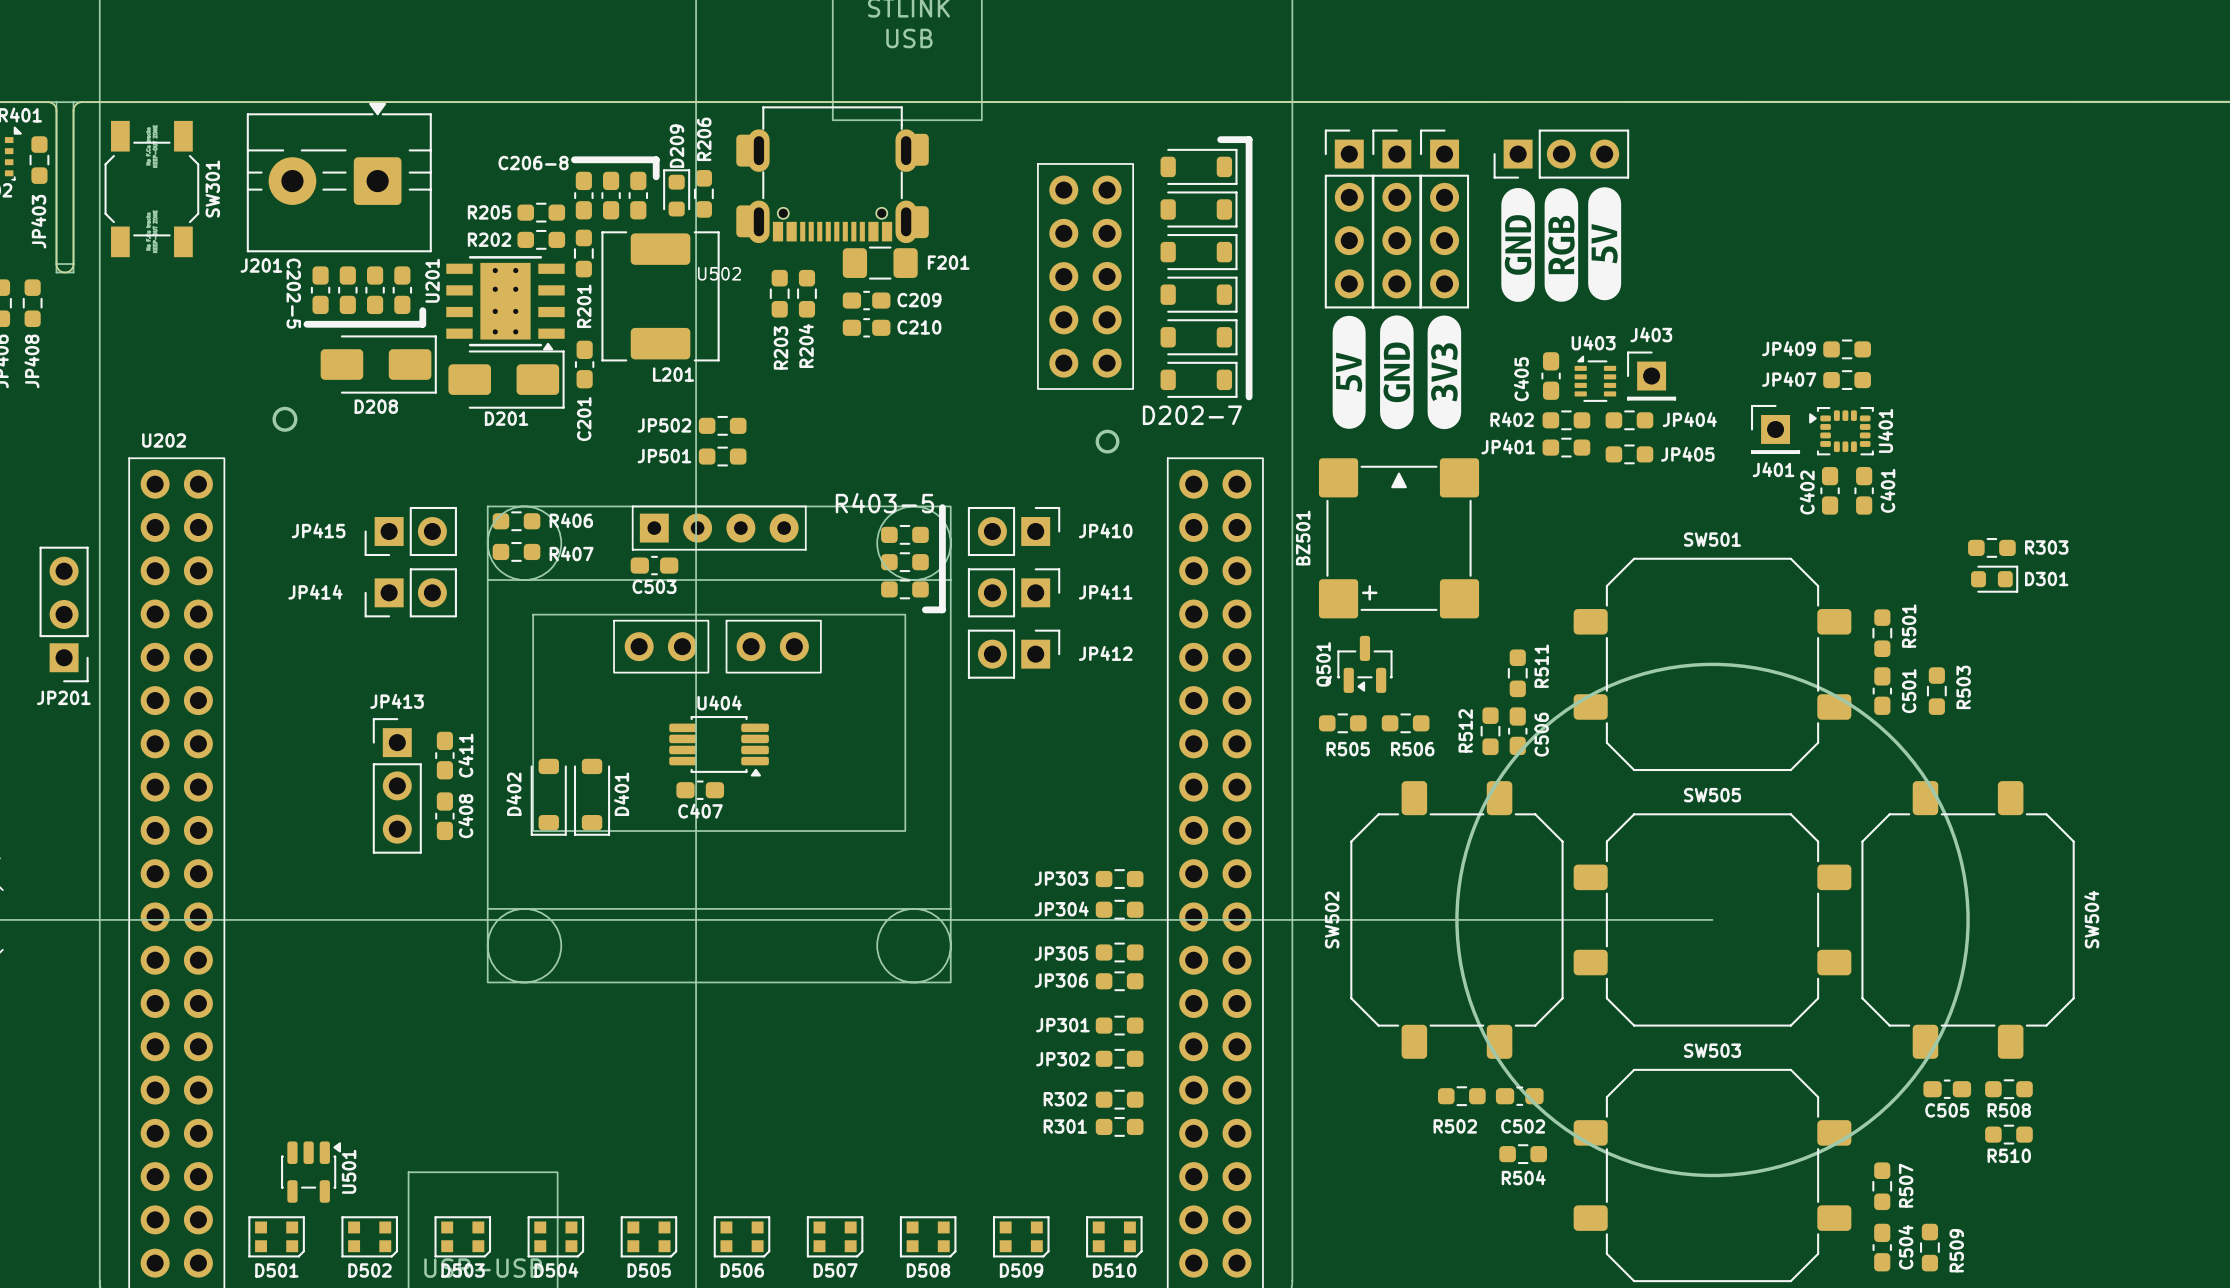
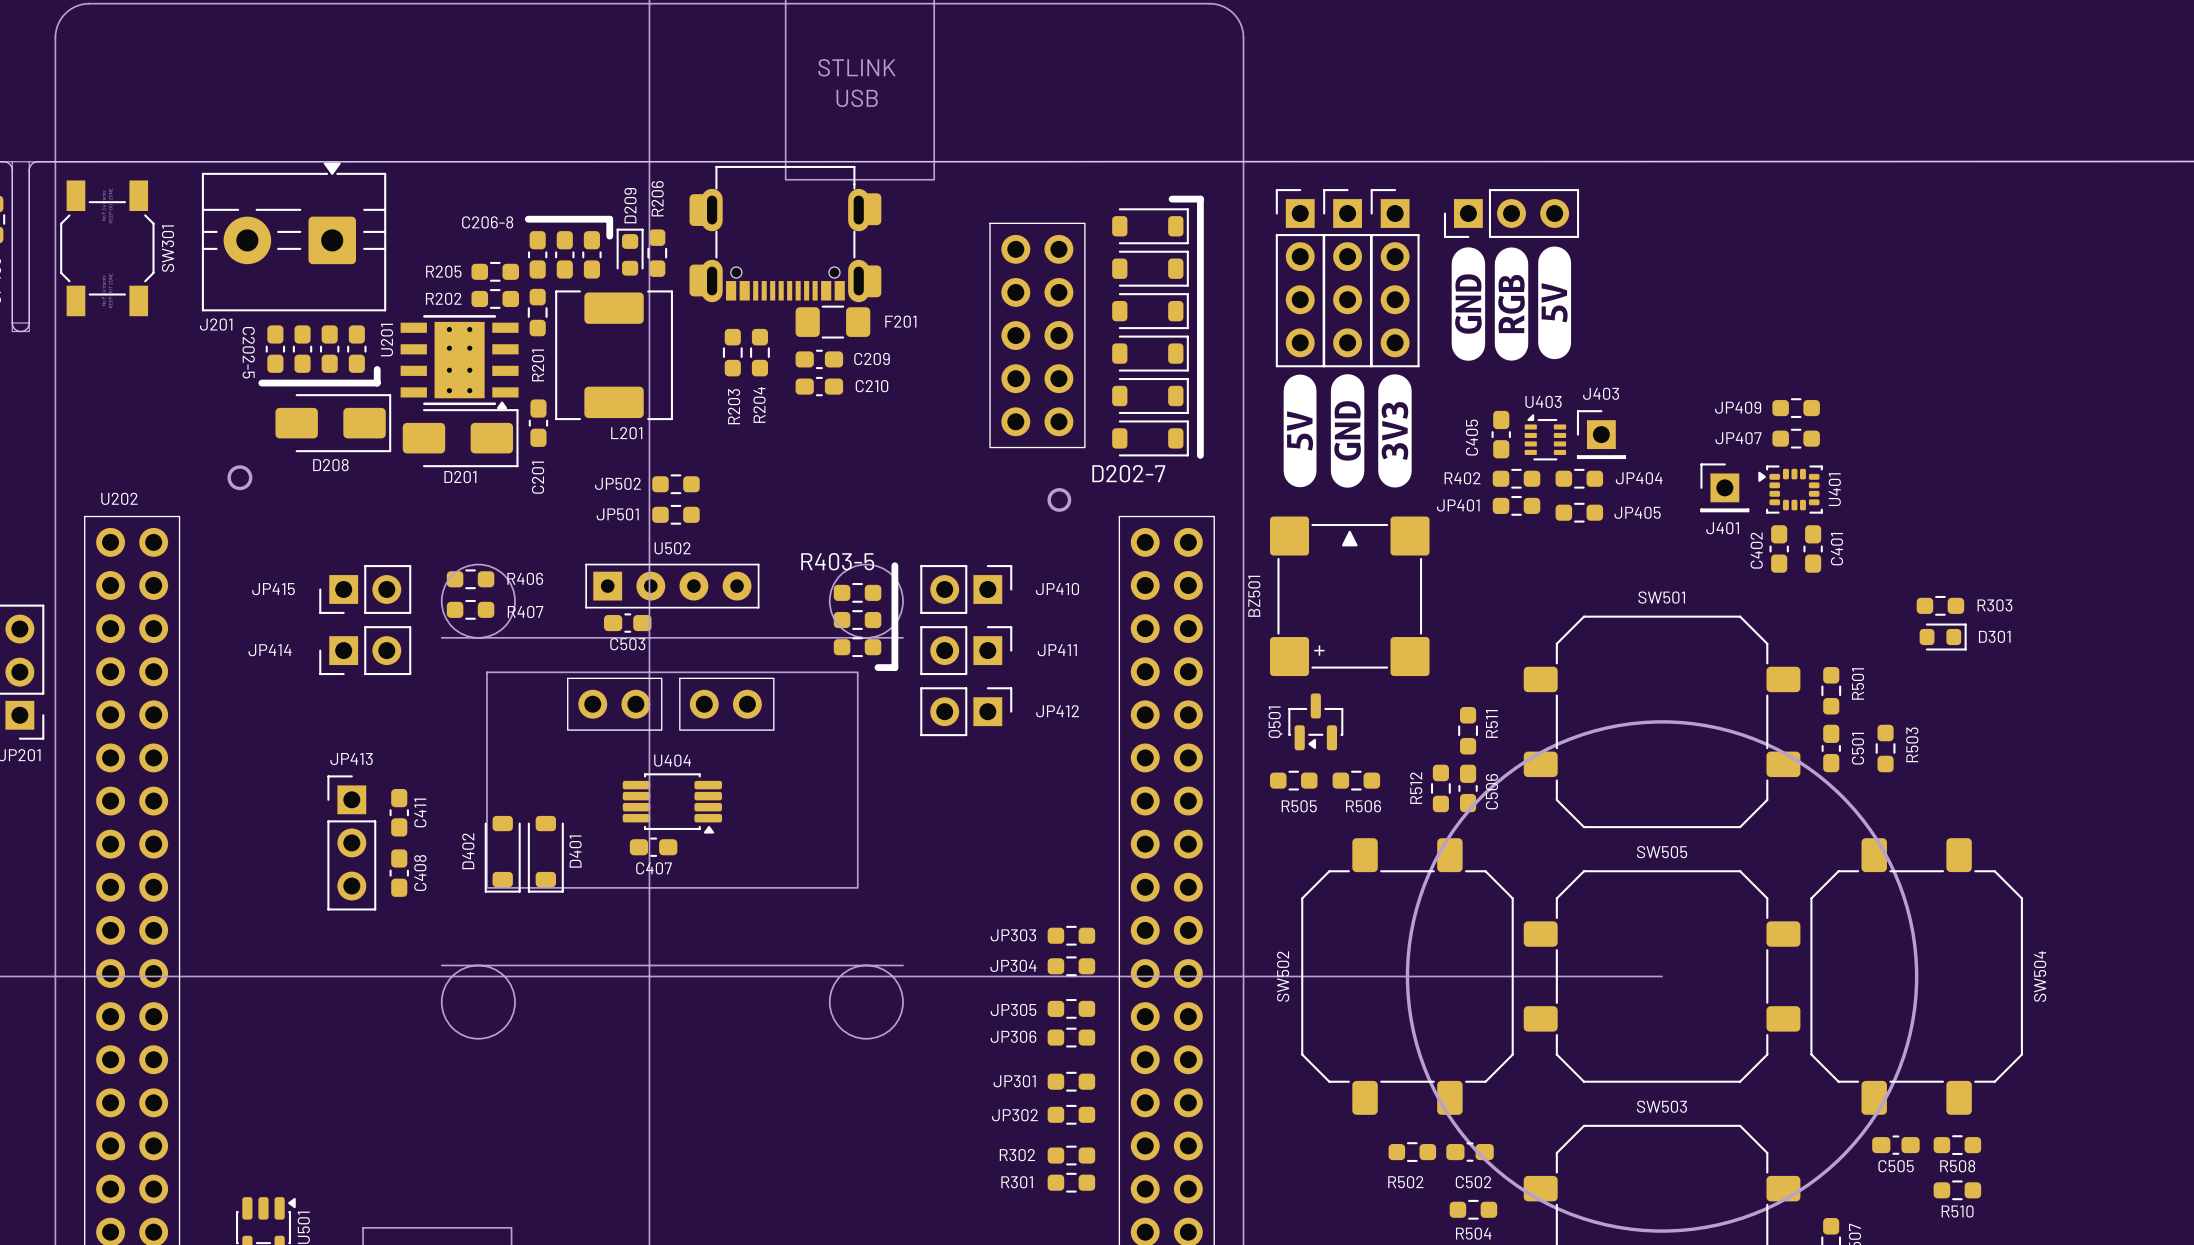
U502 name position: U502 (719, 273) -> U502 (672, 548)
U502 footprint: [486, 505, 952, 984] -> [440, 563, 904, 1040]
C503 position: (654, 565) -> (627, 623)

